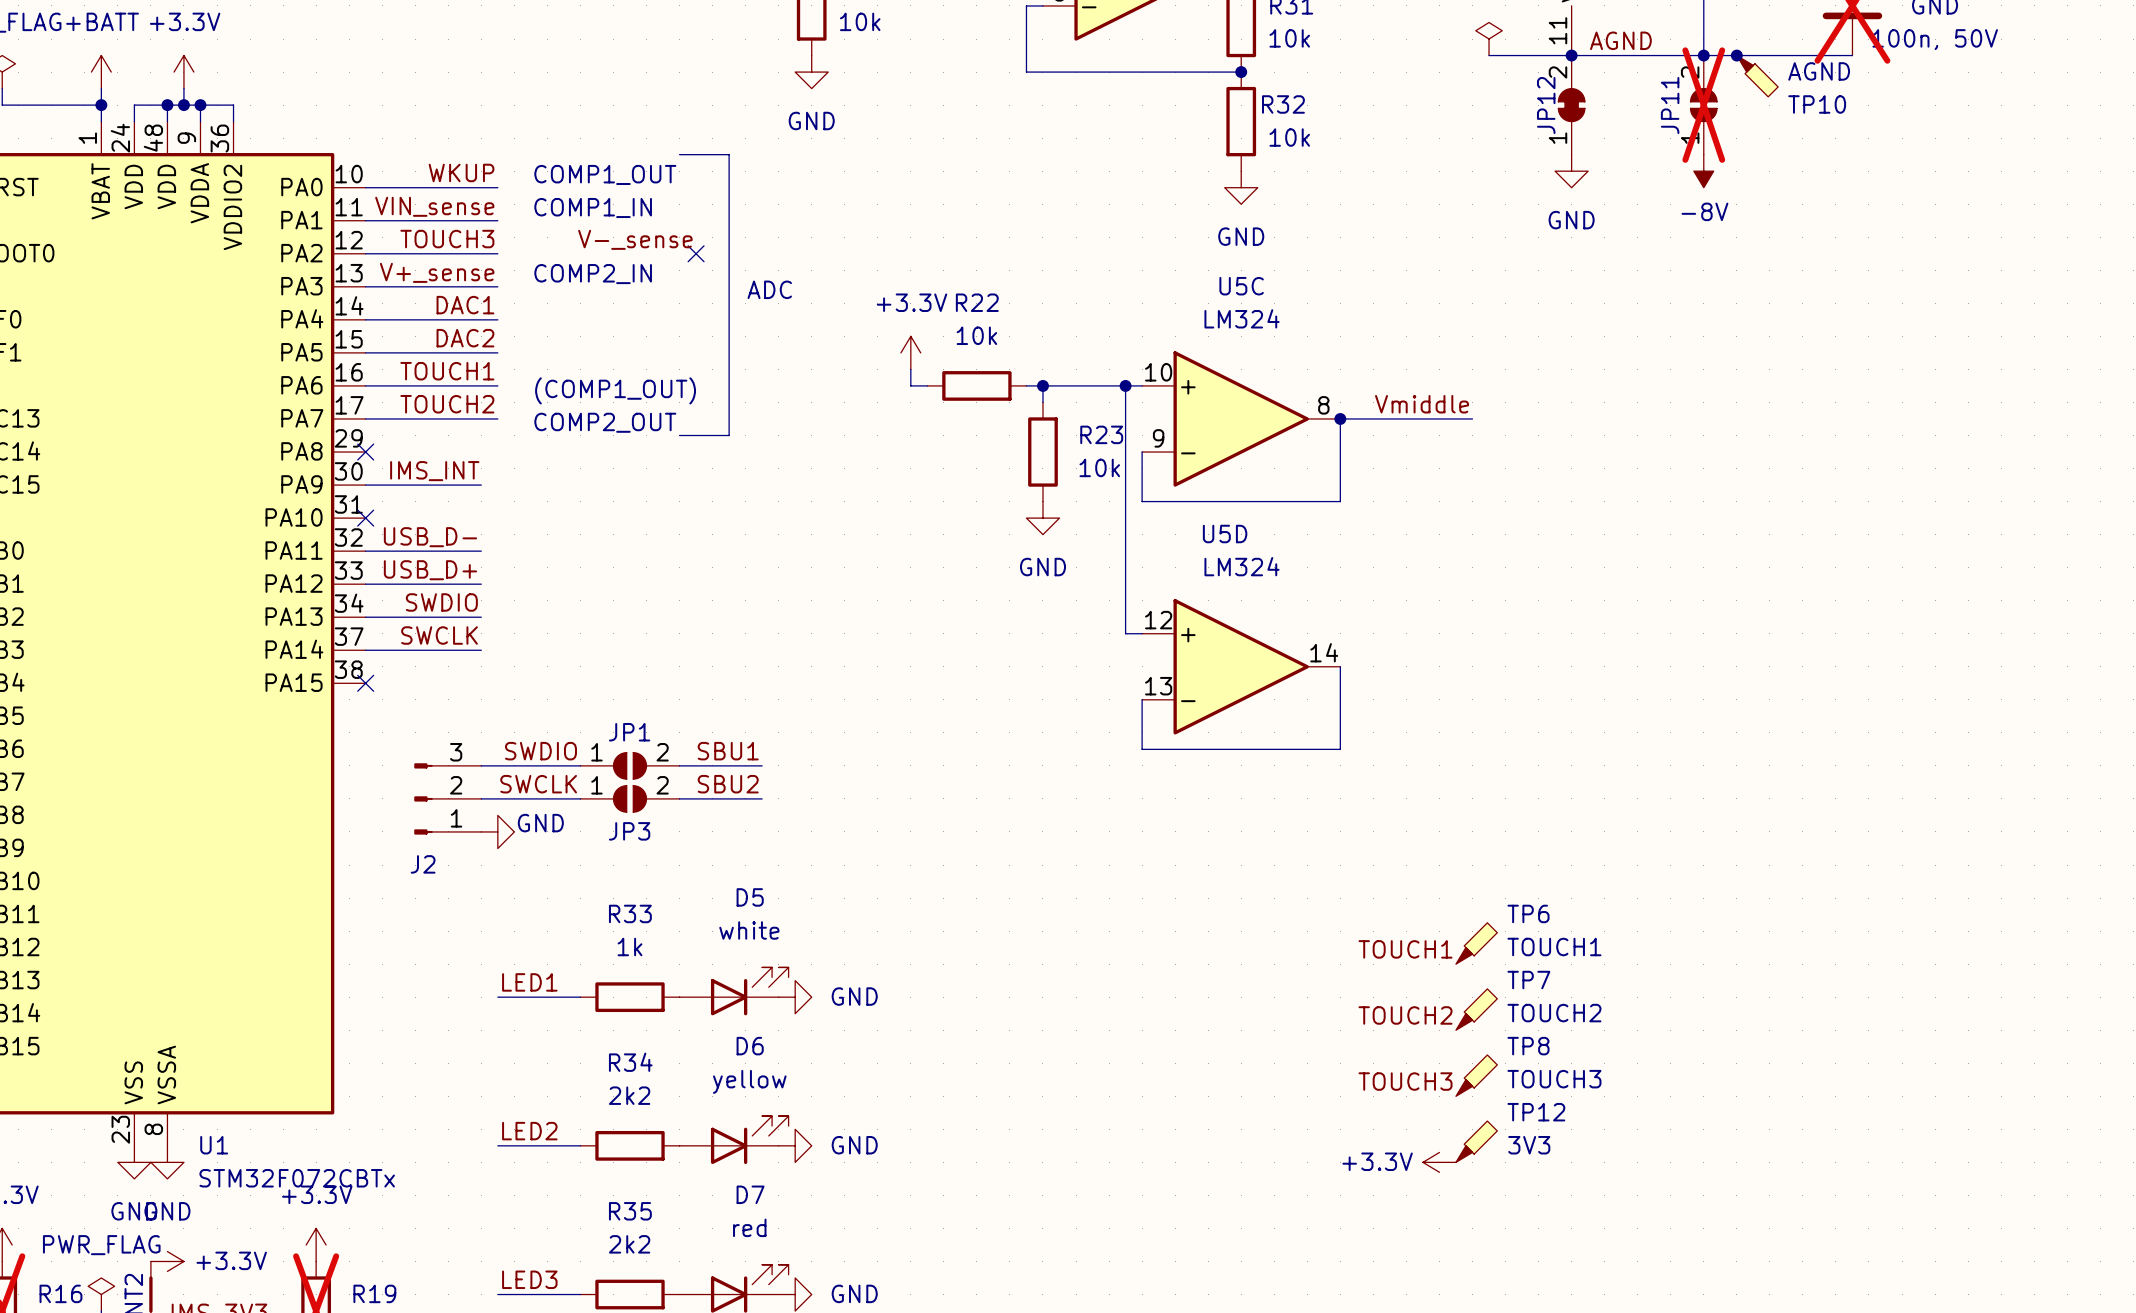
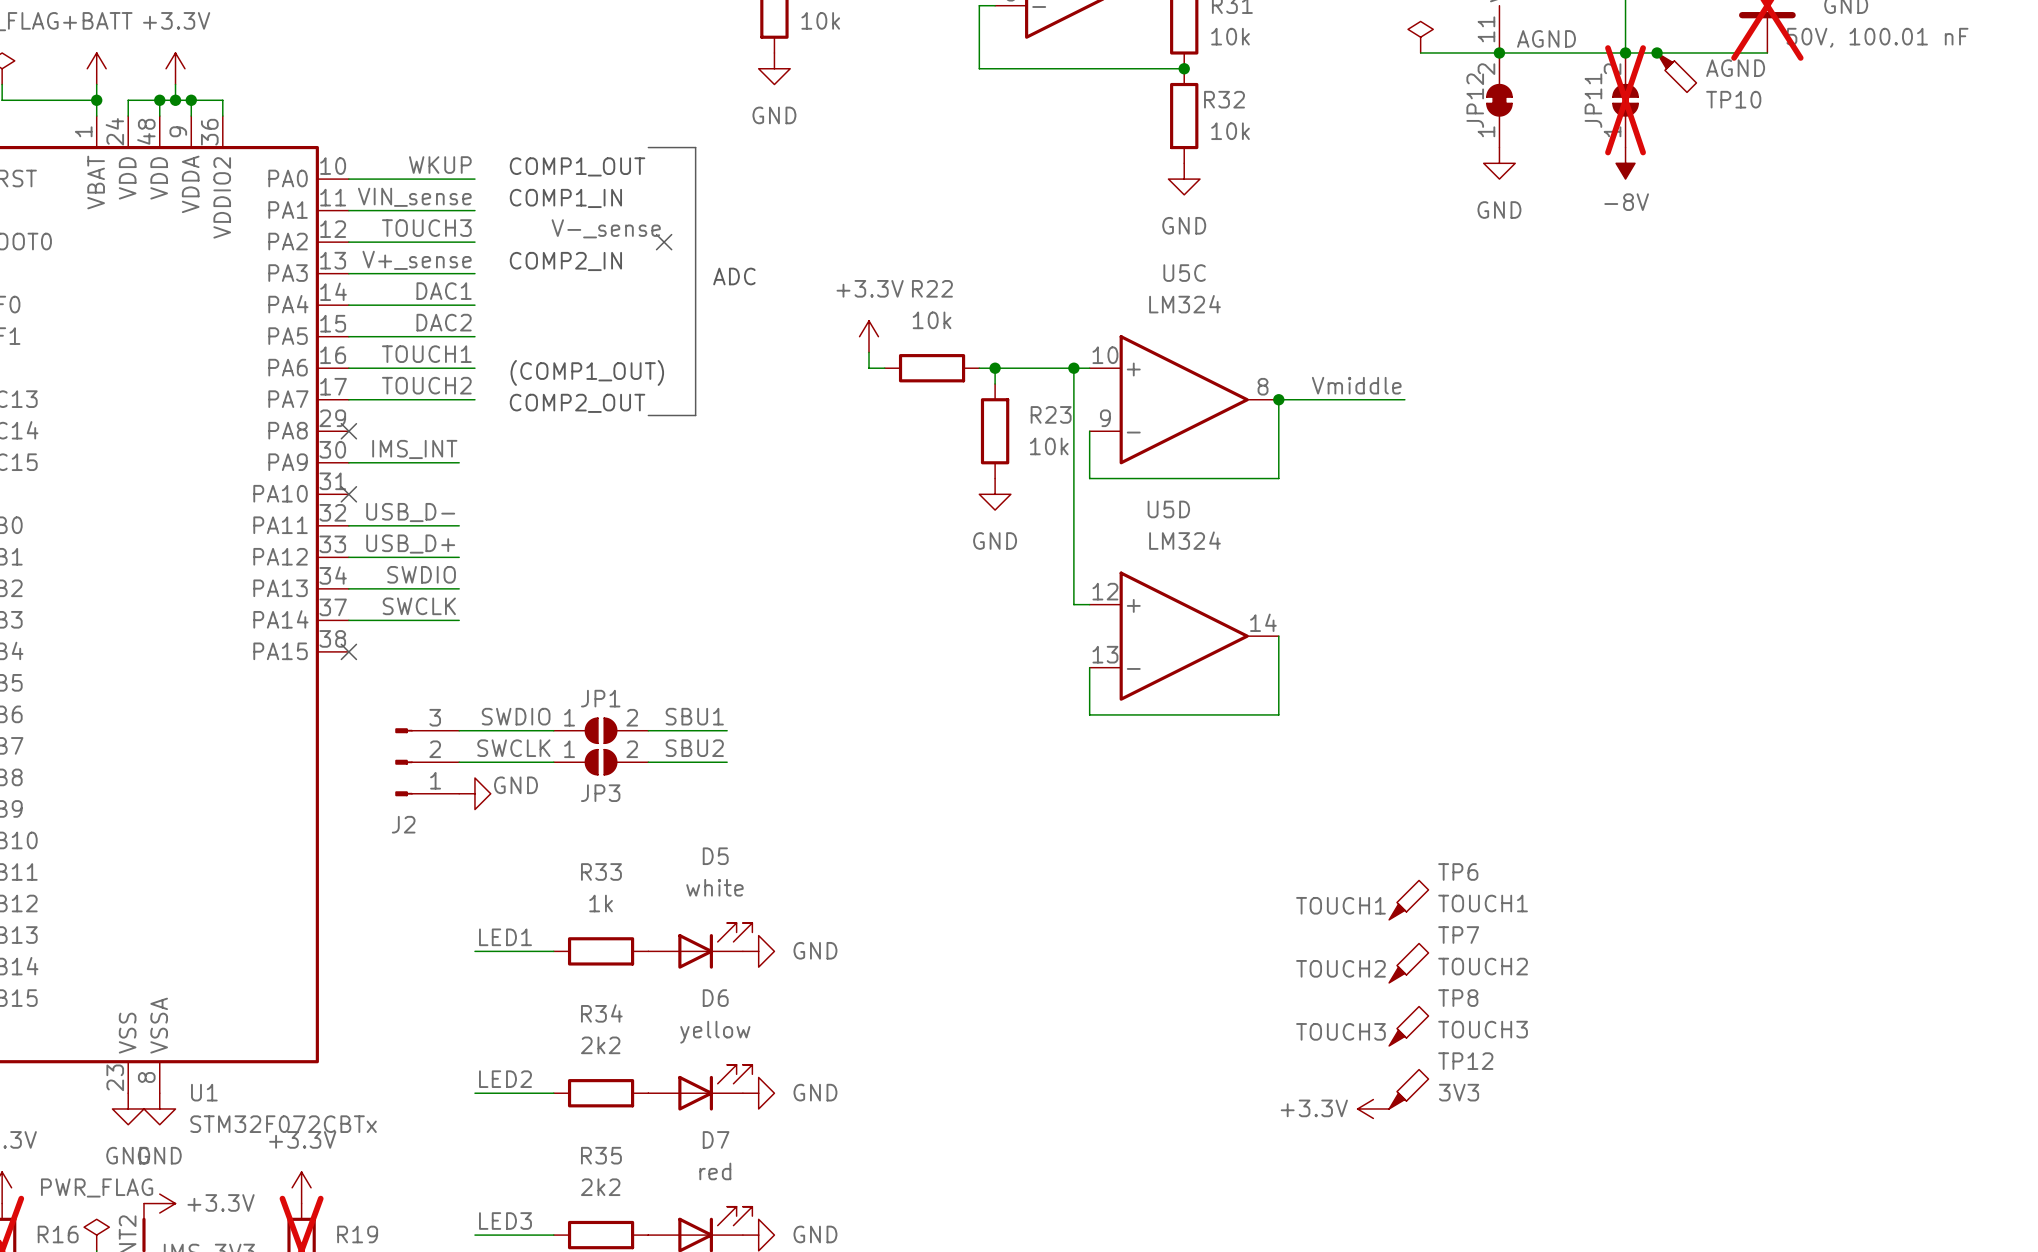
part value: 100n, 50V (1935, 39) -> 50V, 100.01 nF (1877, 37)

